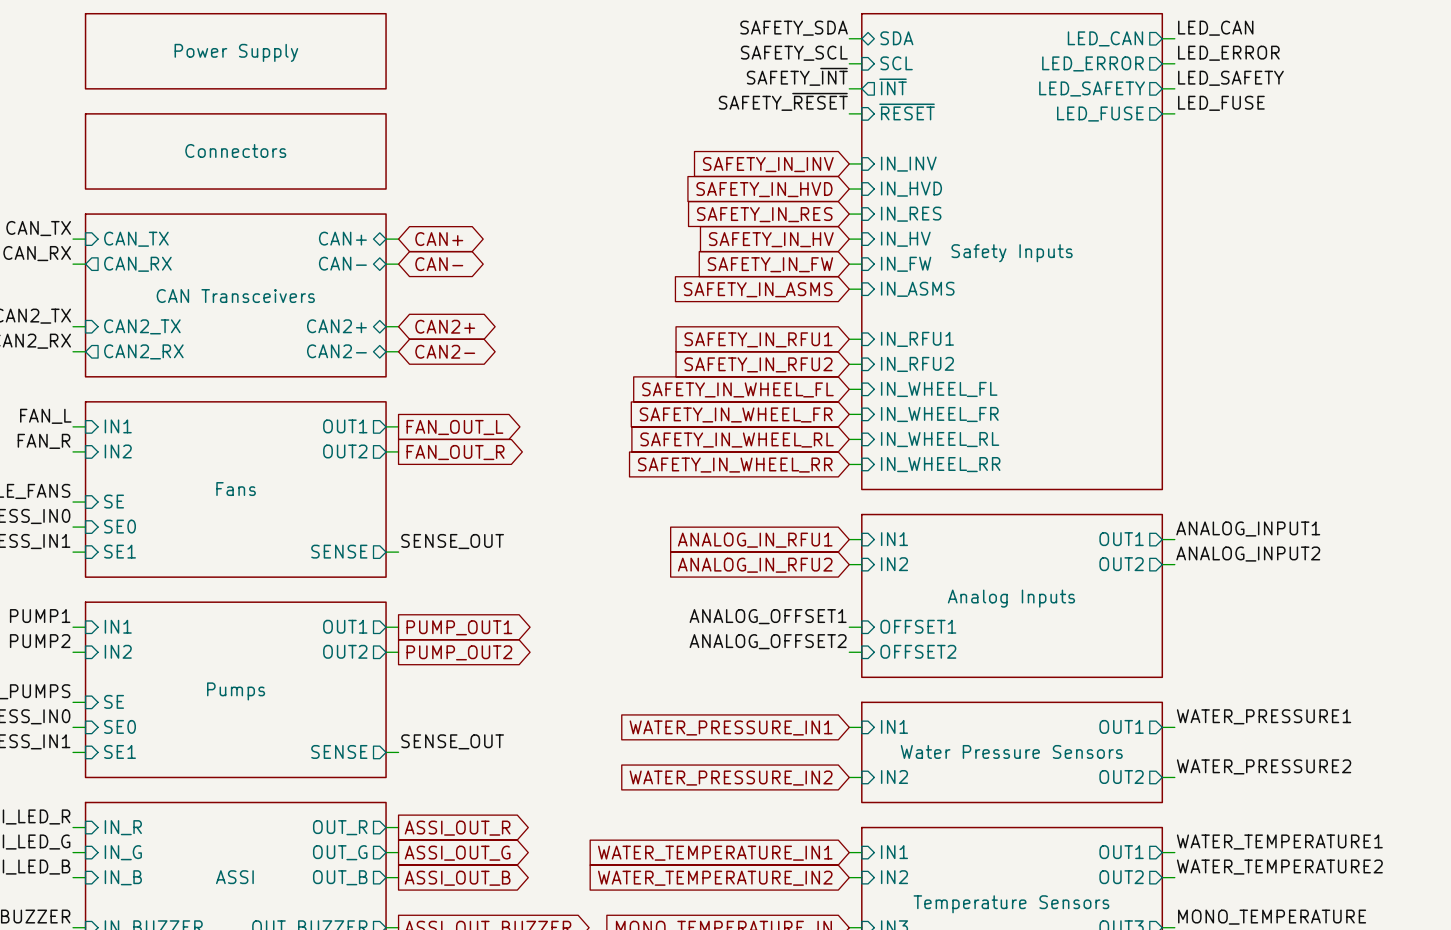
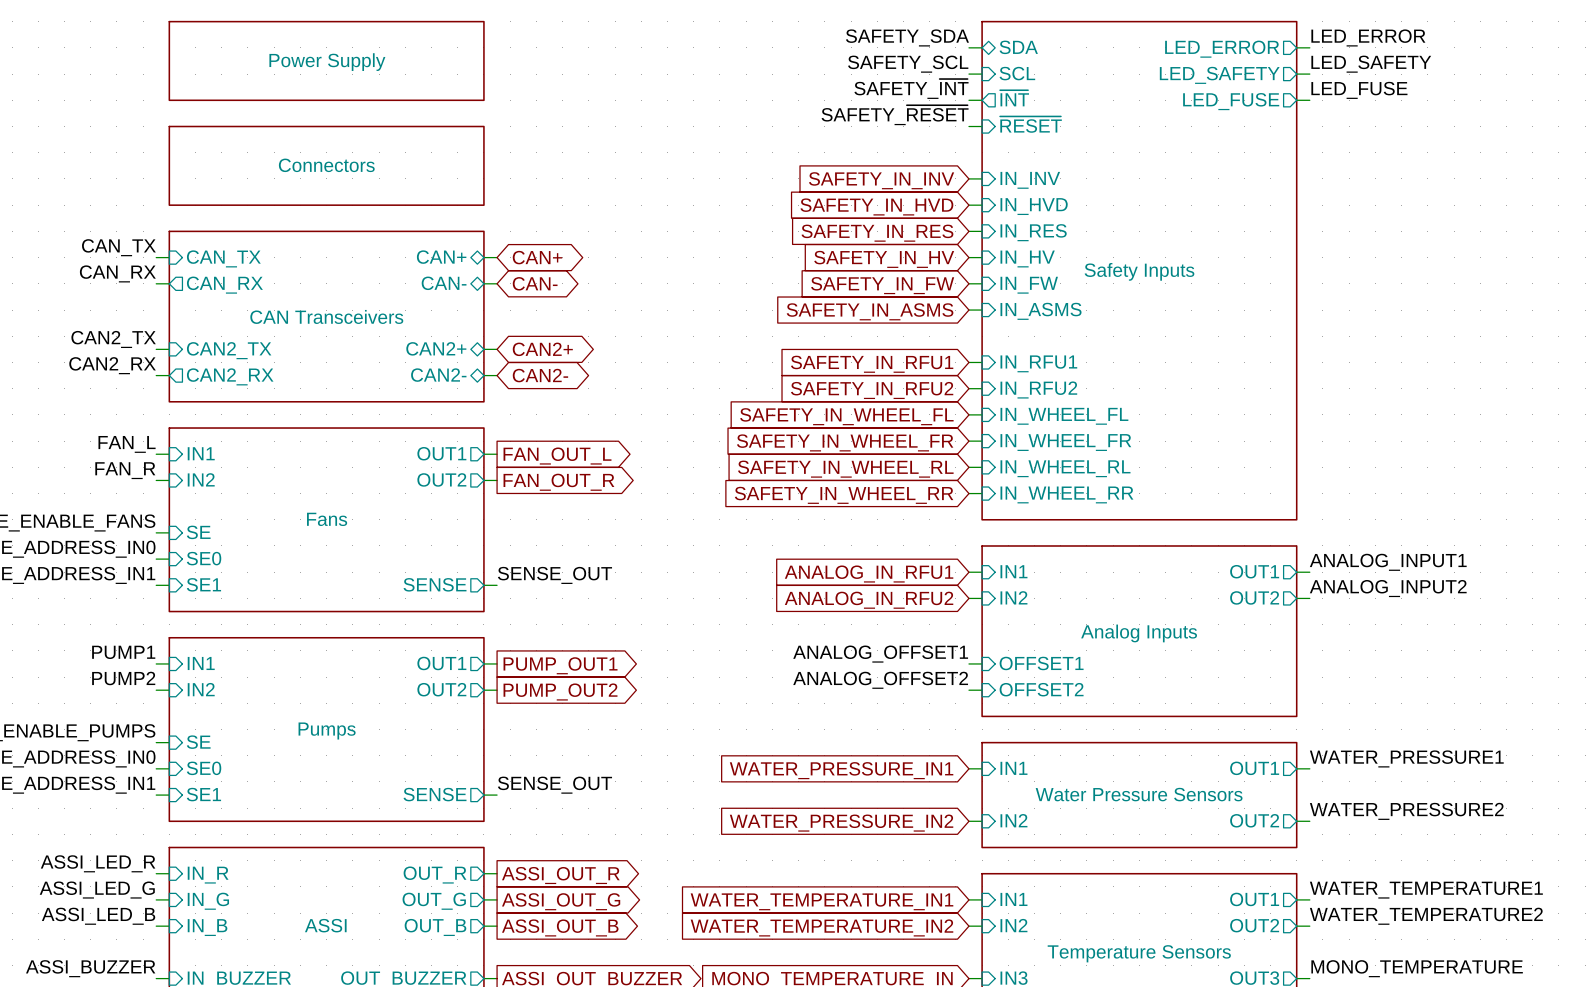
label: LED_CAN (1215, 28) -> LED_ERROR (1368, 37)
sheet pin: LED_CAN (1105, 38) -> LED_ERROR (1222, 49)
label: LED_ERROR (1228, 53) -> LED_SAFETY (1371, 64)
sheet pin: LED_ERROR (1092, 63) -> LED_SAFETY (1219, 75)
label: LED_SAFETY (1230, 78) -> LED_FUSE (1359, 90)
sheet pin: LED_SAFETY (1092, 88) -> LED_FUSE (1231, 101)
label: LED_FUSE (1221, 103) -> none
wire: (1162, 113) (1174, 113) -> none
sheet pin: LED_FUSE (1100, 114) -> none

